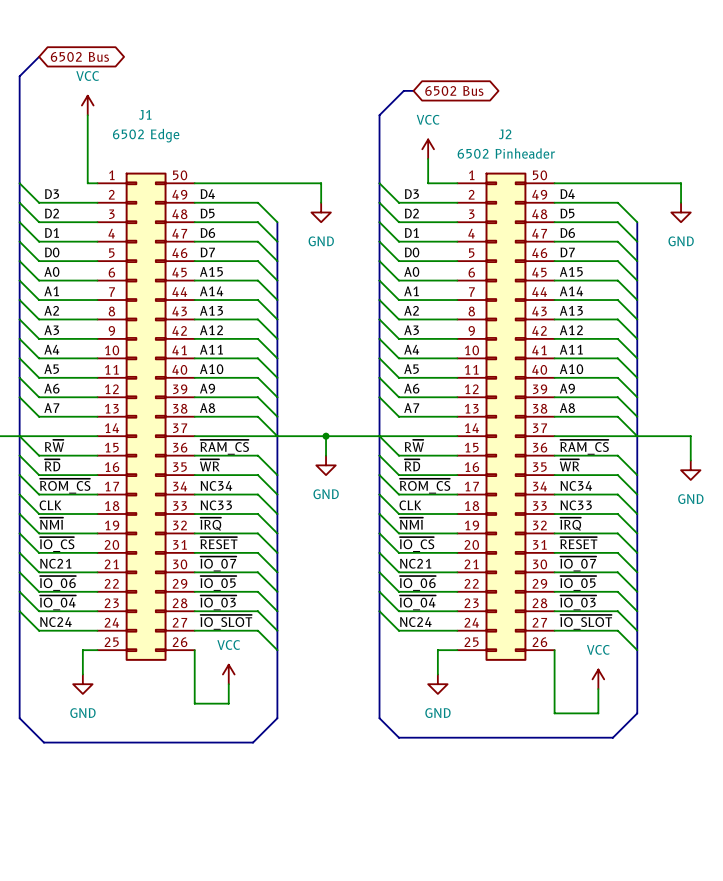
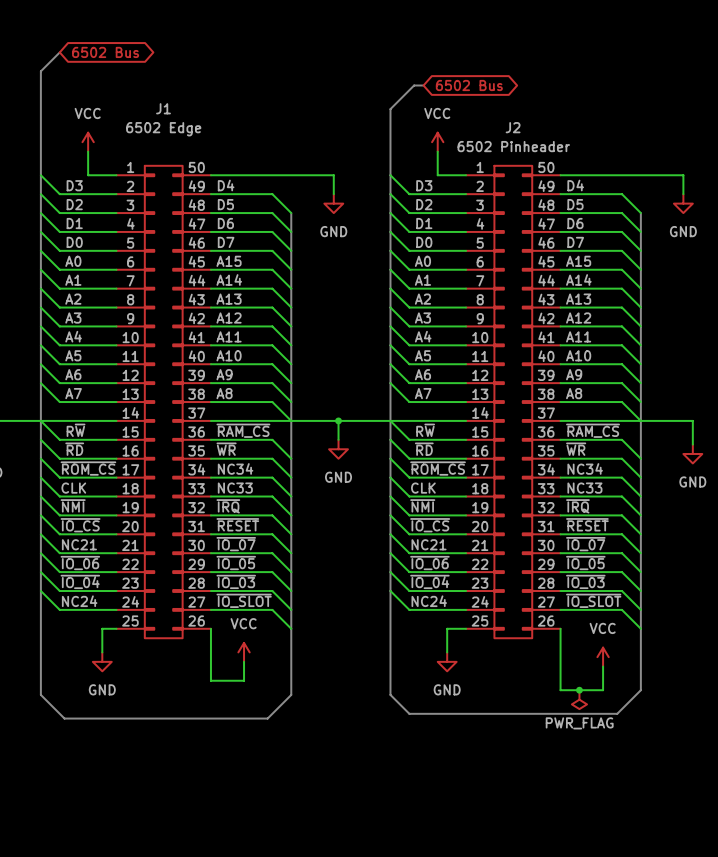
power symbol position: VCC (87, 105) -> VCC (88, 142)
wire: (87, 115) (87, 183) -> (88, 151) (88, 175) (107, 175)
junction: none -> (579, 690)
power symbol: none -> PWR_FLAG (579, 699)

